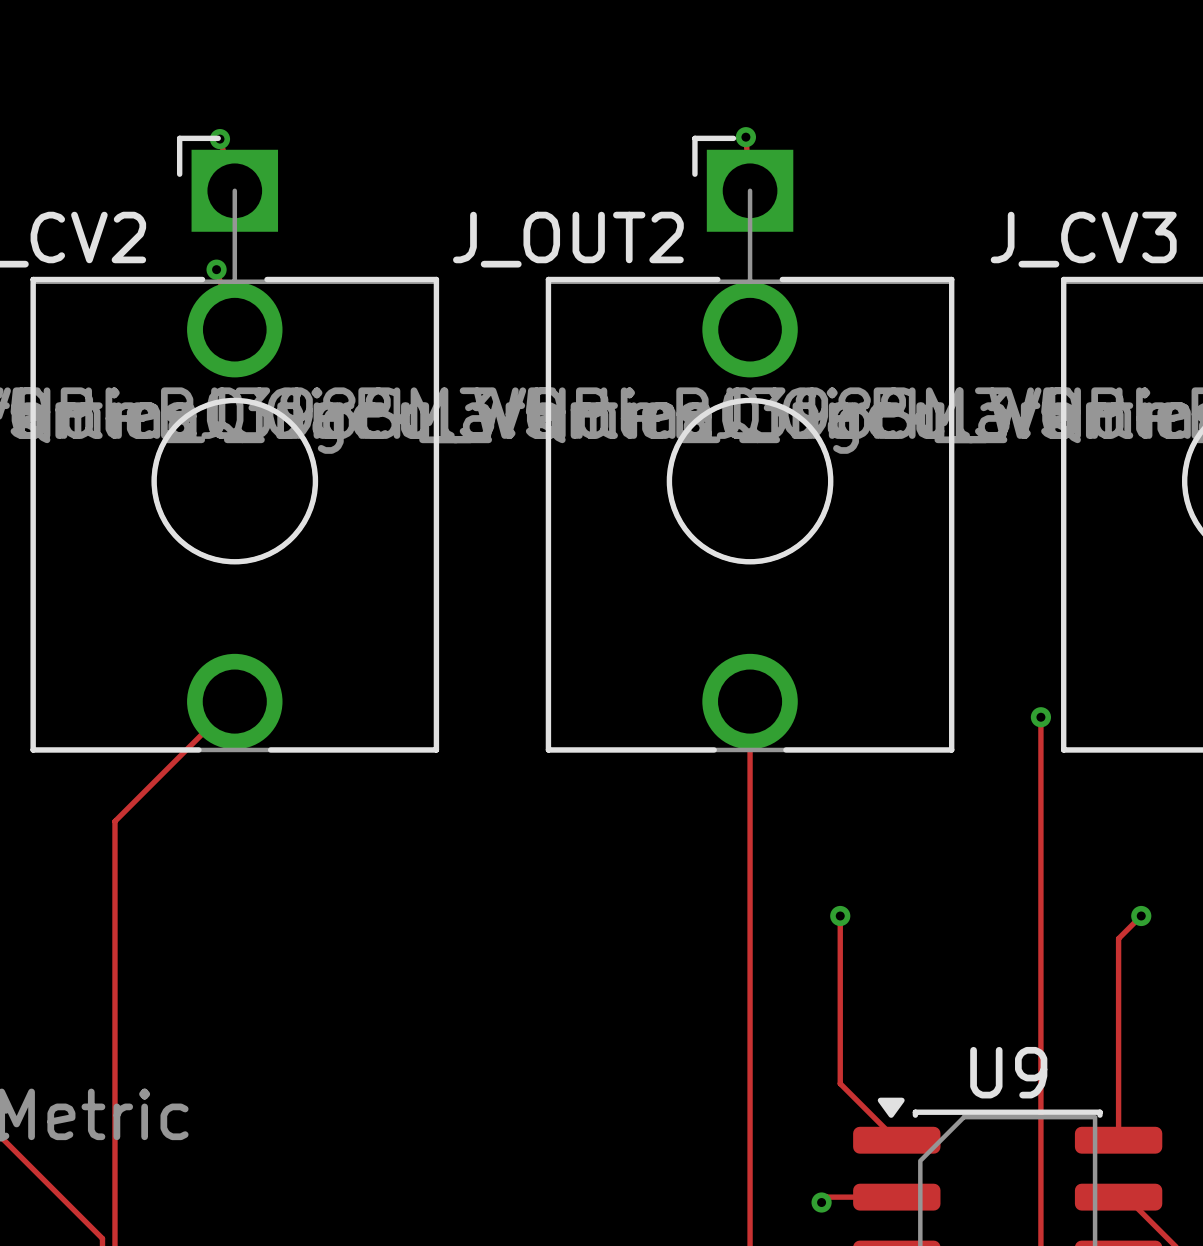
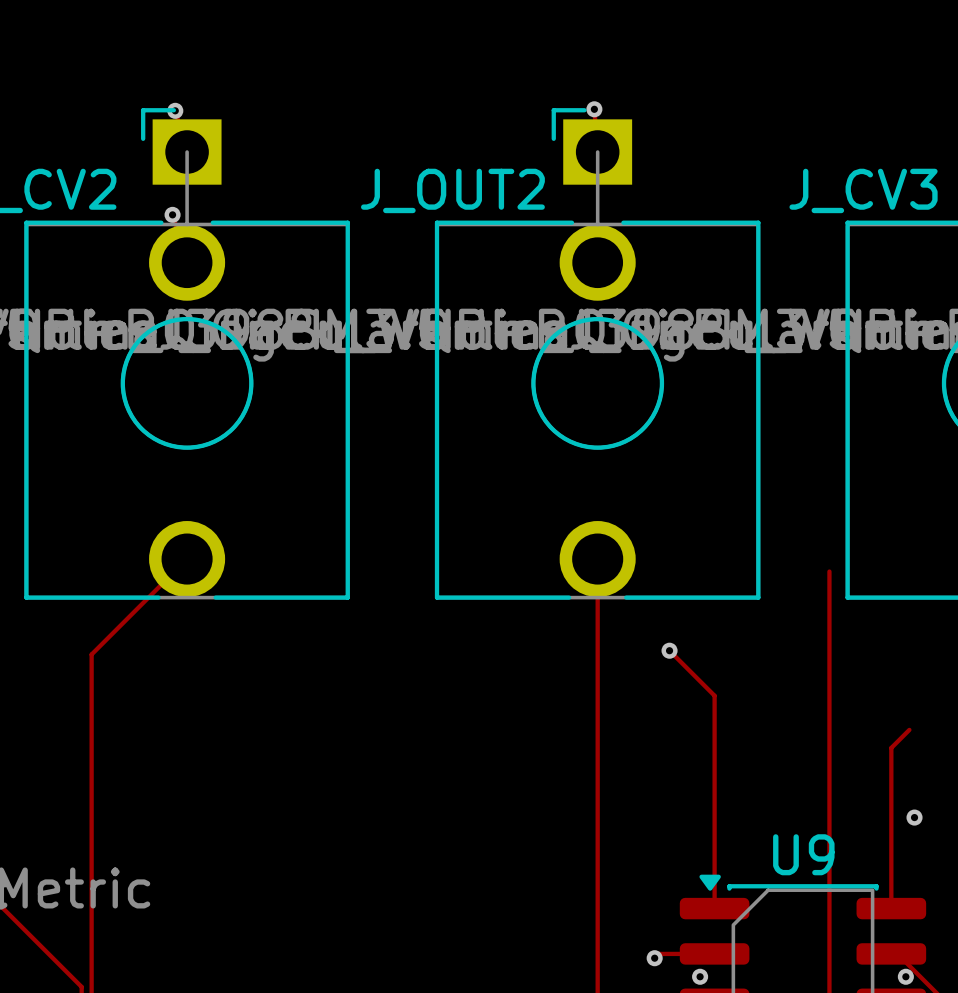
via: (1040, 717) -> none
top track: (840, 916) (840, 1083) (896, 1140) -> (669, 650) (714, 695) (714, 908)
via position: (840, 916) -> (669, 650)
via position: (1141, 916) -> (914, 817)
via: none -> (700, 976)
via: none -> (905, 976)

